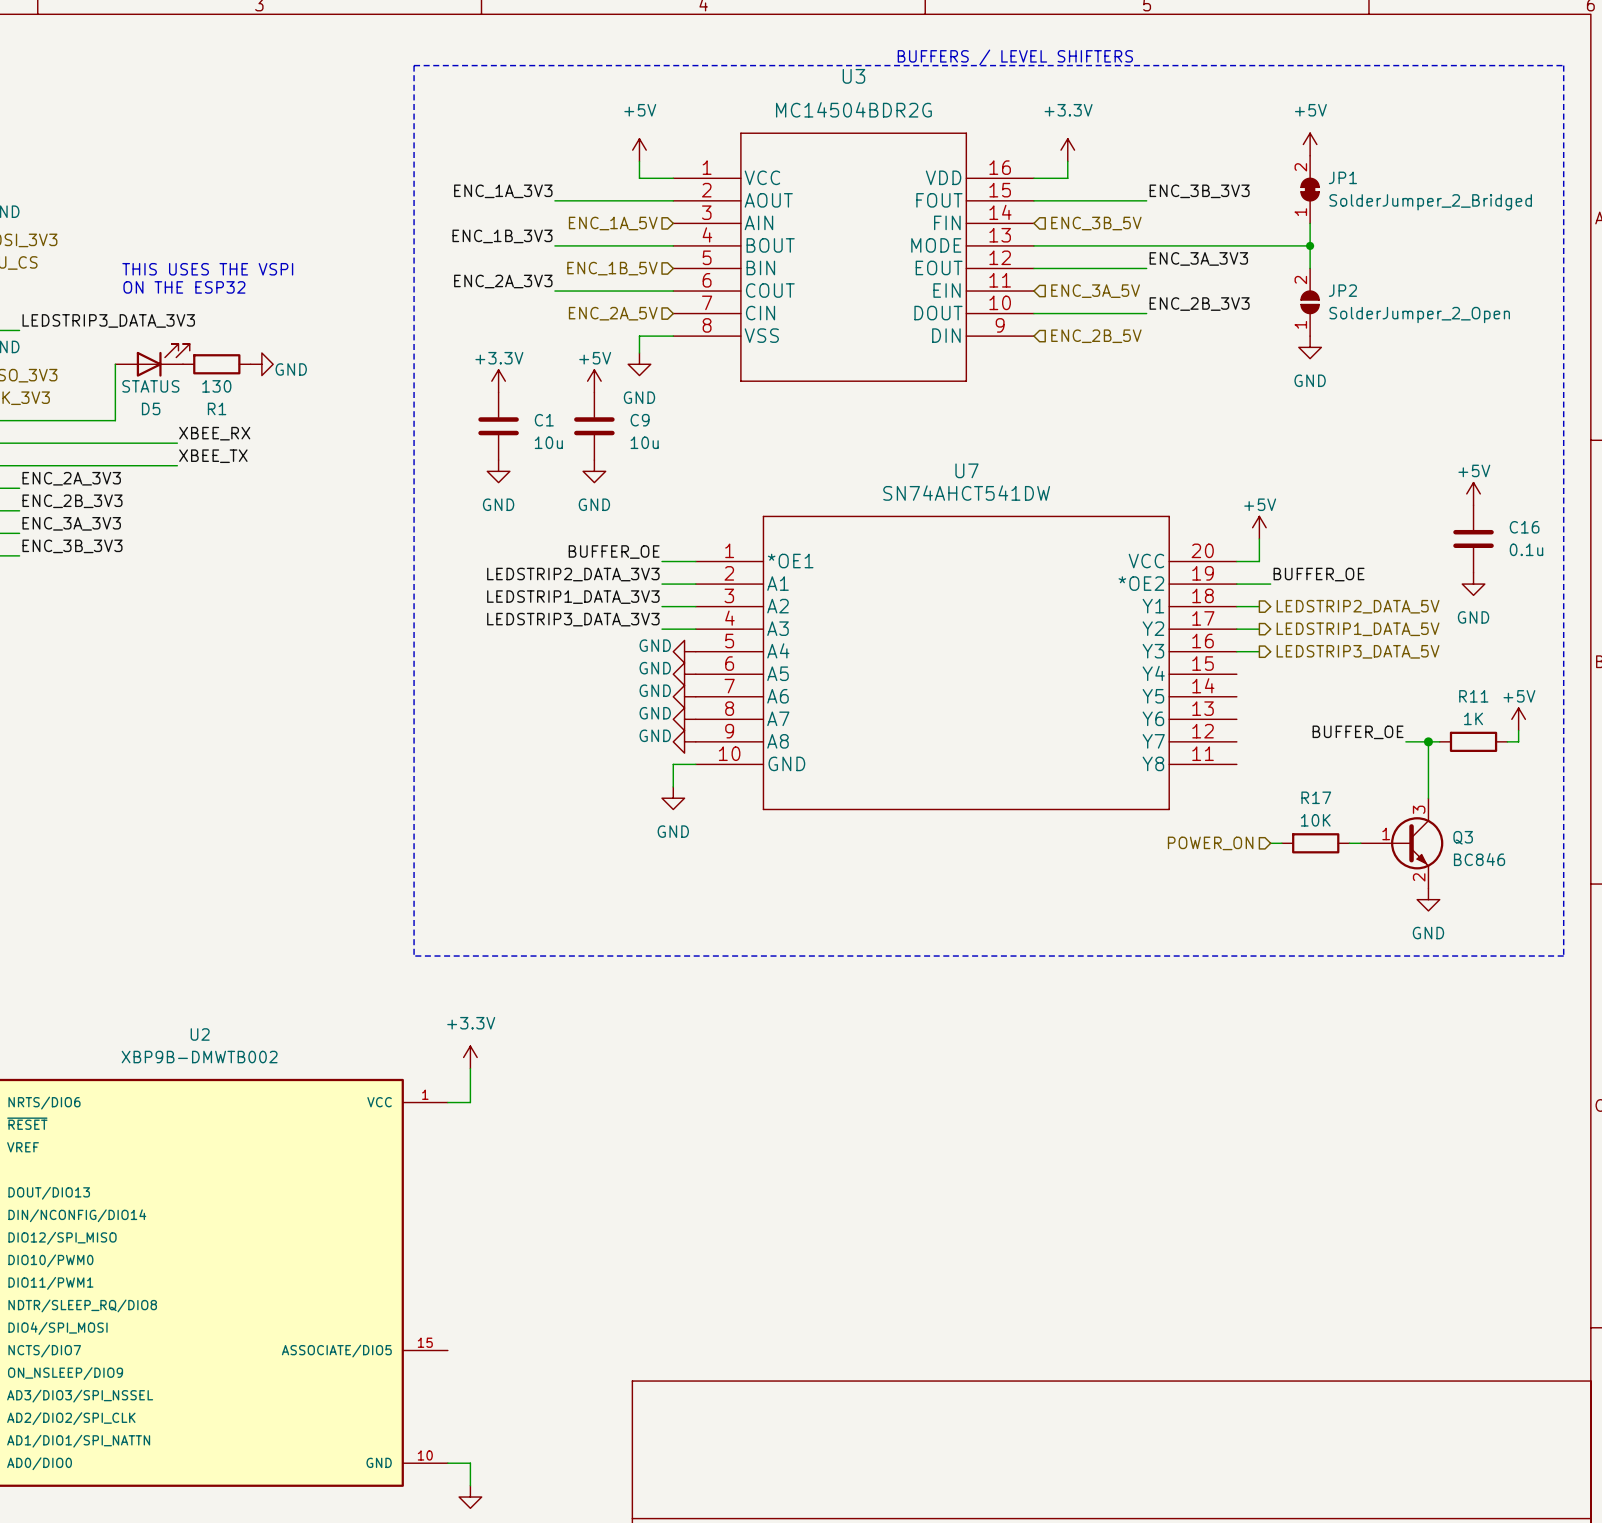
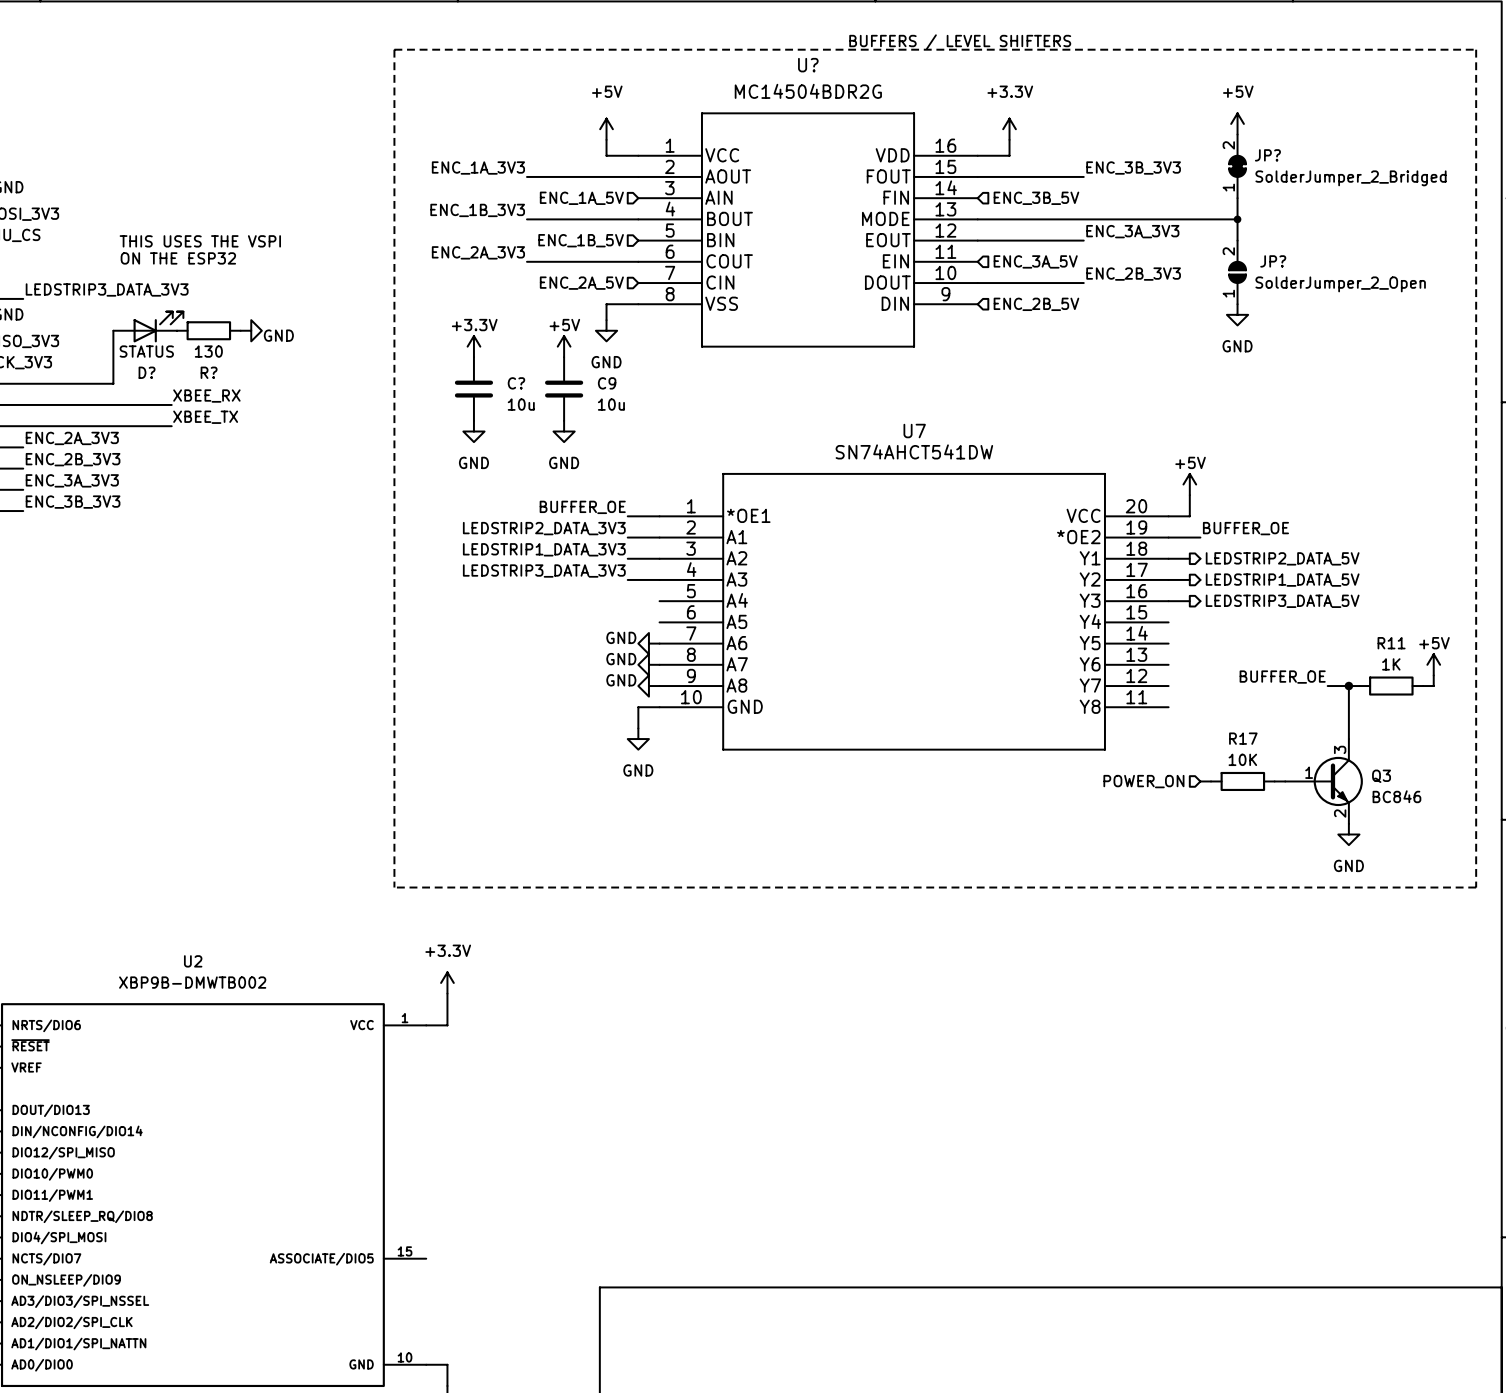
U3 name: U3 (853, 76) -> U? (808, 65)
JP1 name: JP1 (1342, 177) -> JP? (1267, 155)
JP2 name: JP2 (1342, 290) -> JP? (1273, 261)
D5 name: D5 (151, 408) -> D? (147, 372)
R1 name: R1 (217, 408) -> R? (209, 372)
C1 name: C1 (544, 420) -> C? (516, 383)
power symbol: +5V (1473, 493) -> none
C16: 0.1u (1473, 538) -> none
power symbol: GND (1473, 584) -> none
power symbol: GND (684, 651) -> none
power symbol: GND (684, 674) -> none

